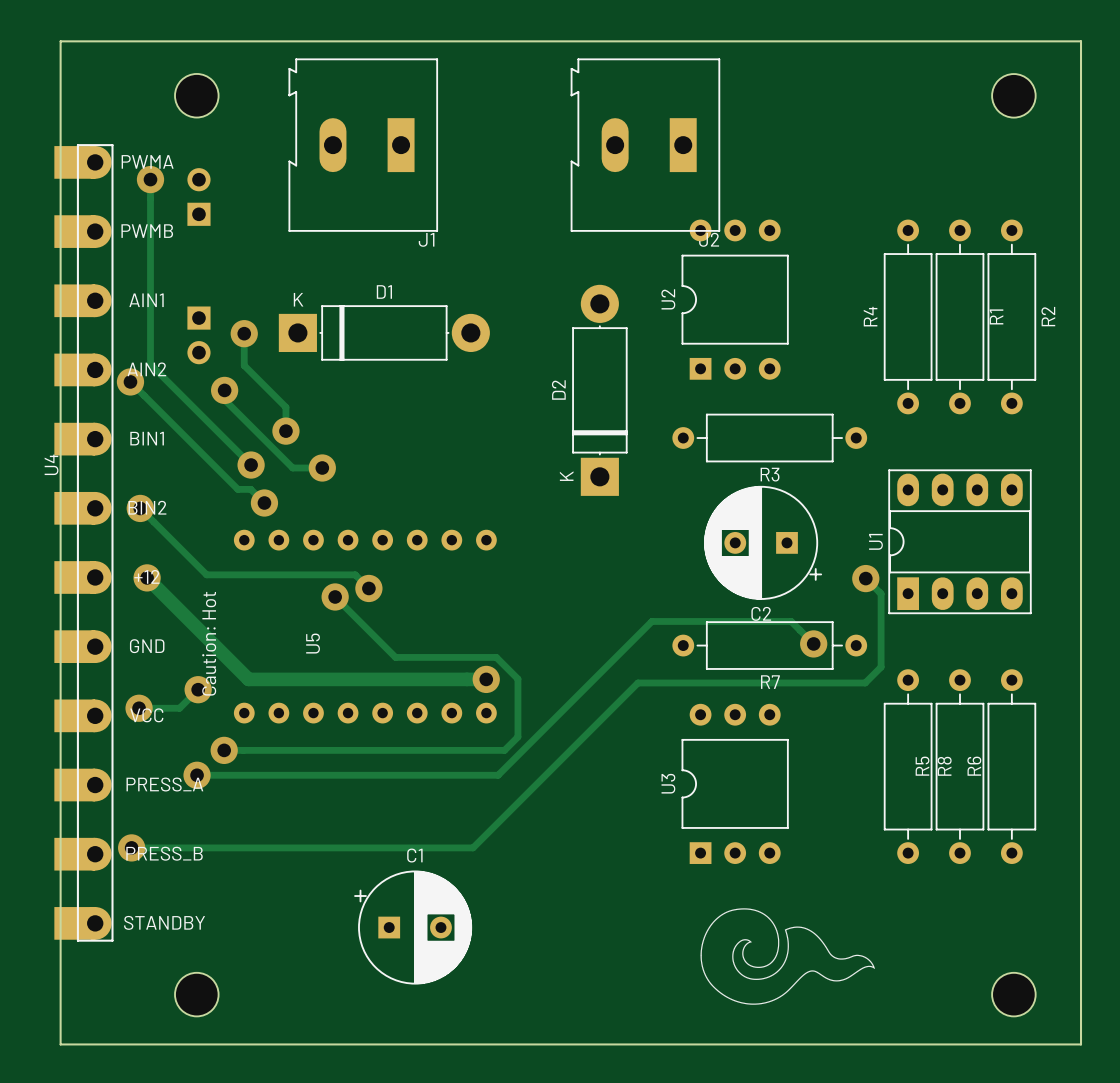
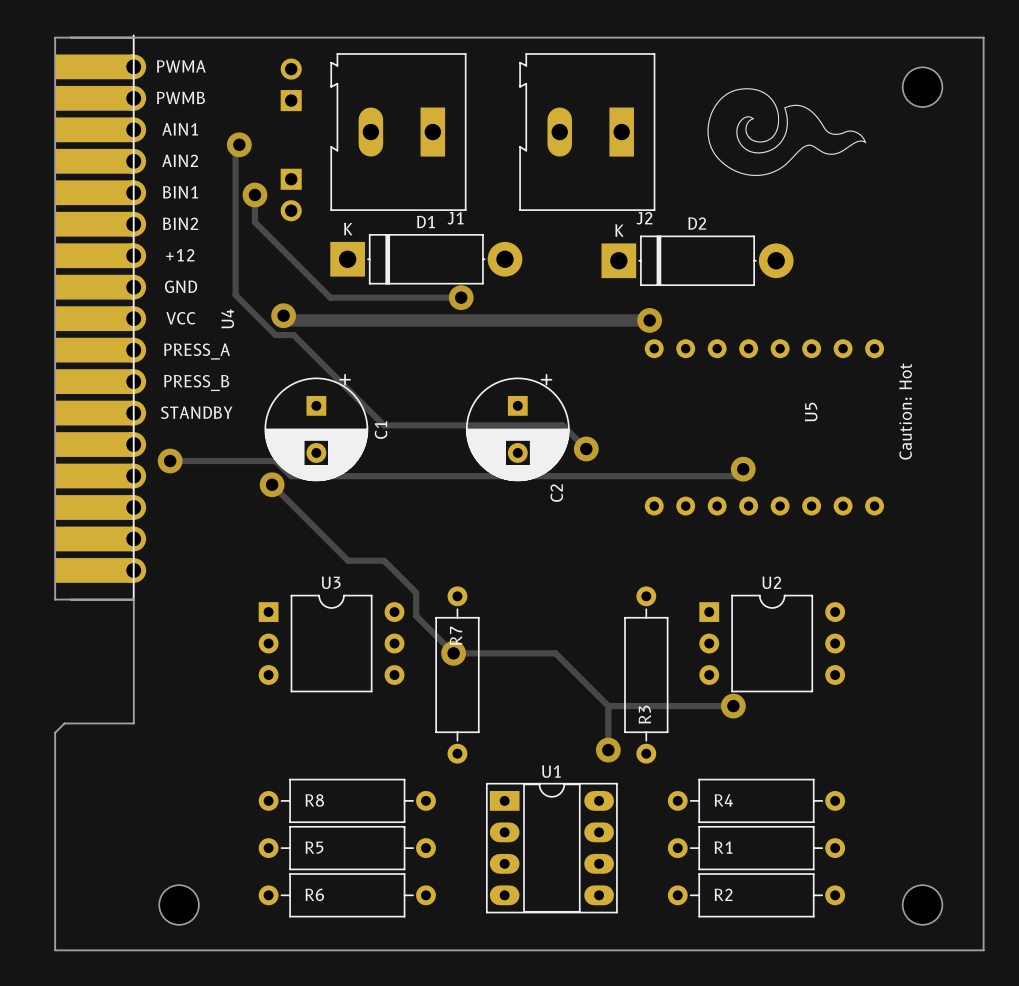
part: none -> (291, 84)
part: (196, 95) -> none
drawing: none -> [707, 88, 867, 176]
U4 footprint: [54, 144, 114, 942] -> [55, 34, 147, 601]
J1 position: (363, 145) -> (398, 132)
track: none -> (239, 144) (235, 148) (235, 295) (275, 335) (293, 335) (384, 425) (562, 425) (586, 448)
via: none -> (239, 144)
track: (150, 179) (150, 364) (251, 465) -> none
via: (150, 179) -> none
part: (198, 197) -> none
track: none -> (254, 194) (254, 222) (330, 297) (461, 297)
via: none -> (254, 194)
part: none -> (291, 194)
U2 rotation: 0° (735, 299) -> 90° clockwise (772, 643)
U2 position: (735, 299) -> (772, 643)
R4 rotation: 0° (908, 316) -> 90° clockwise (756, 800)
R4 position: (908, 316) -> (756, 800)
R1 rotation: 0° (959, 316) -> 90° clockwise (756, 848)
R1 position: (959, 316) -> (756, 848)
R1 name position: R1 (996, 316) -> R1 (723, 847)
R2 rotation: 0° (1011, 316) -> 90° clockwise (756, 895)
R2 position: (1011, 316) -> (756, 895)
R2 name position: R2 (1048, 316) -> R2 (723, 894)
via: none -> (461, 297)
D1 position: (384, 332) -> (426, 259)
track: (244, 333) (244, 365) (285, 407) (285, 431) -> none
via: (244, 333) -> none
part: (198, 335) -> none
track: none -> (283, 315) (288, 320) (649, 320)
via: none -> (283, 315)
via: none -> (649, 320)
track: (130, 381) (237, 489) (250, 489) (264, 503) -> none
via: (130, 381) -> none
track: (224, 390) (224, 399) (292, 467) (322, 467) -> none
via: (224, 390) -> none
D2 rotation: 0° (599, 390) -> 90° clockwise (697, 260)
D2 position: (599, 390) -> (697, 260)
via: (285, 431) -> none
R3 rotation: 0° (769, 438) -> 90° clockwise (646, 675)
R3 position: (769, 438) -> (646, 675)
U4 name position: U4 (51, 464) -> U4 (227, 318)
via: (251, 465) -> none
via: (322, 467) -> none
via: none -> (586, 448)
via: (264, 503) -> none
track: none -> (170, 461) (275, 461) (290, 476) (736, 476) (743, 469)
via: none -> (170, 461)
track: (140, 508) (206, 574) (355, 574) (368, 588) -> none
via: (140, 508) -> none
via: none -> (743, 469)
track: none -> (272, 484) (348, 560) (384, 560) (416, 592) (416, 615) (453, 653) (555, 653) (608, 706)
via: none -> (272, 484)
U1 rotation: 0° (959, 541) -> 90° clockwise (551, 848)
U1 position: (959, 541) -> (551, 848)
C2 rotation: 0° (763, 542) -> 90° counterclockwise (517, 427)
C2 position: (763, 542) -> (517, 427)
track: (147, 577) (248, 679) (486, 679) -> none
via: (147, 577) -> none
track: (865, 578) (881, 593) (881, 667) (865, 682) (637, 682) (473, 847) (131, 847) -> none
via: (865, 578) -> none
via: (368, 588) -> none
track: (335, 596) (395, 657) (496, 657) (517, 679) (517, 737) (504, 750) (224, 750) -> none
via: (335, 596) -> none
C2 name position: C2 (761, 613) -> C2 (556, 493)
U5 rotation: 0° (365, 626) -> 180° (764, 427)
U5 position: (365, 626) -> (764, 427)
track: (813, 643) (791, 621) (651, 621) (498, 775) (197, 775) -> none
via: (813, 643) -> none
R7 rotation: 0° (769, 645) -> 90° clockwise (457, 675)
R7 position: (769, 645) -> (457, 675)
board edge: (60, 658) (60, 805) -> (55, 599) (133, 599) (133, 723) (64, 723) (55, 732)
via position: (486, 679) -> (453, 653)
R7 name position: R7 (770, 682) -> R7 (456, 635)
track: (198, 689) (179, 708) (139, 708) -> none
via: (198, 689) -> none
via: (139, 708) -> none
via: (224, 750) -> none
R8 rotation: 0° (908, 766) -> 90° clockwise (347, 800)
R8 position: (908, 766) -> (347, 800)
R8 name position: R8 (944, 766) -> R8 (314, 800)
R5 rotation: 0° (959, 766) -> 90° clockwise (347, 848)
R5 position: (959, 766) -> (347, 848)
R6 rotation: 0° (1011, 766) -> 90° clockwise (347, 895)
R6 position: (1011, 766) -> (347, 895)
via: (197, 775) -> none
track: none -> (608, 706) (608, 750)
track: none -> (608, 706) (733, 706)
via: none -> (733, 706)
U3 rotation: 0° (735, 783) -> 90° clockwise (331, 643)
U3 position: (735, 783) -> (331, 643)
via: none -> (608, 750)
via: (131, 847) -> none
drawing: [700, 908, 876, 1005] -> none
C1 rotation: 0° (413, 927) -> 90° clockwise (316, 427)
C1 position: (413, 927) -> (316, 427)

